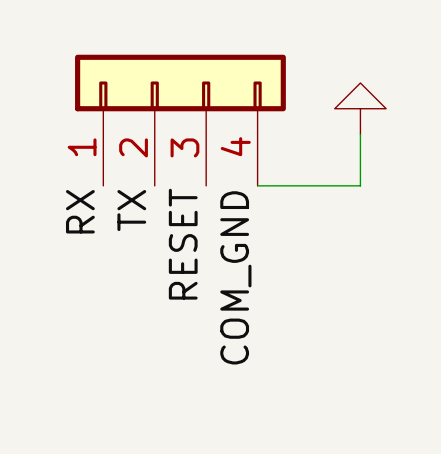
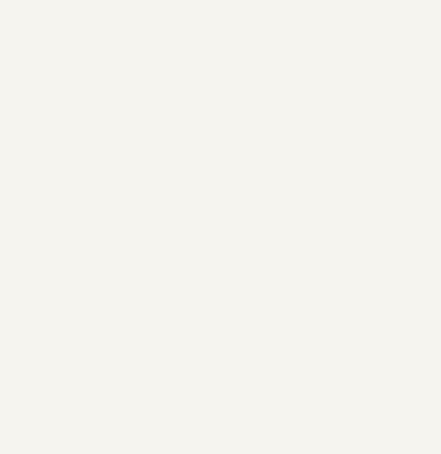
power symbol: (360, 108) -> none
part: (180, 120) -> none
wire: (360, 134) (360, 185) (257, 185) -> none
label: TX (131, 210) -> none
label: RX (80, 211) -> none
label: RESET (183, 244) -> none
label: COM_GND (235, 277) -> none

